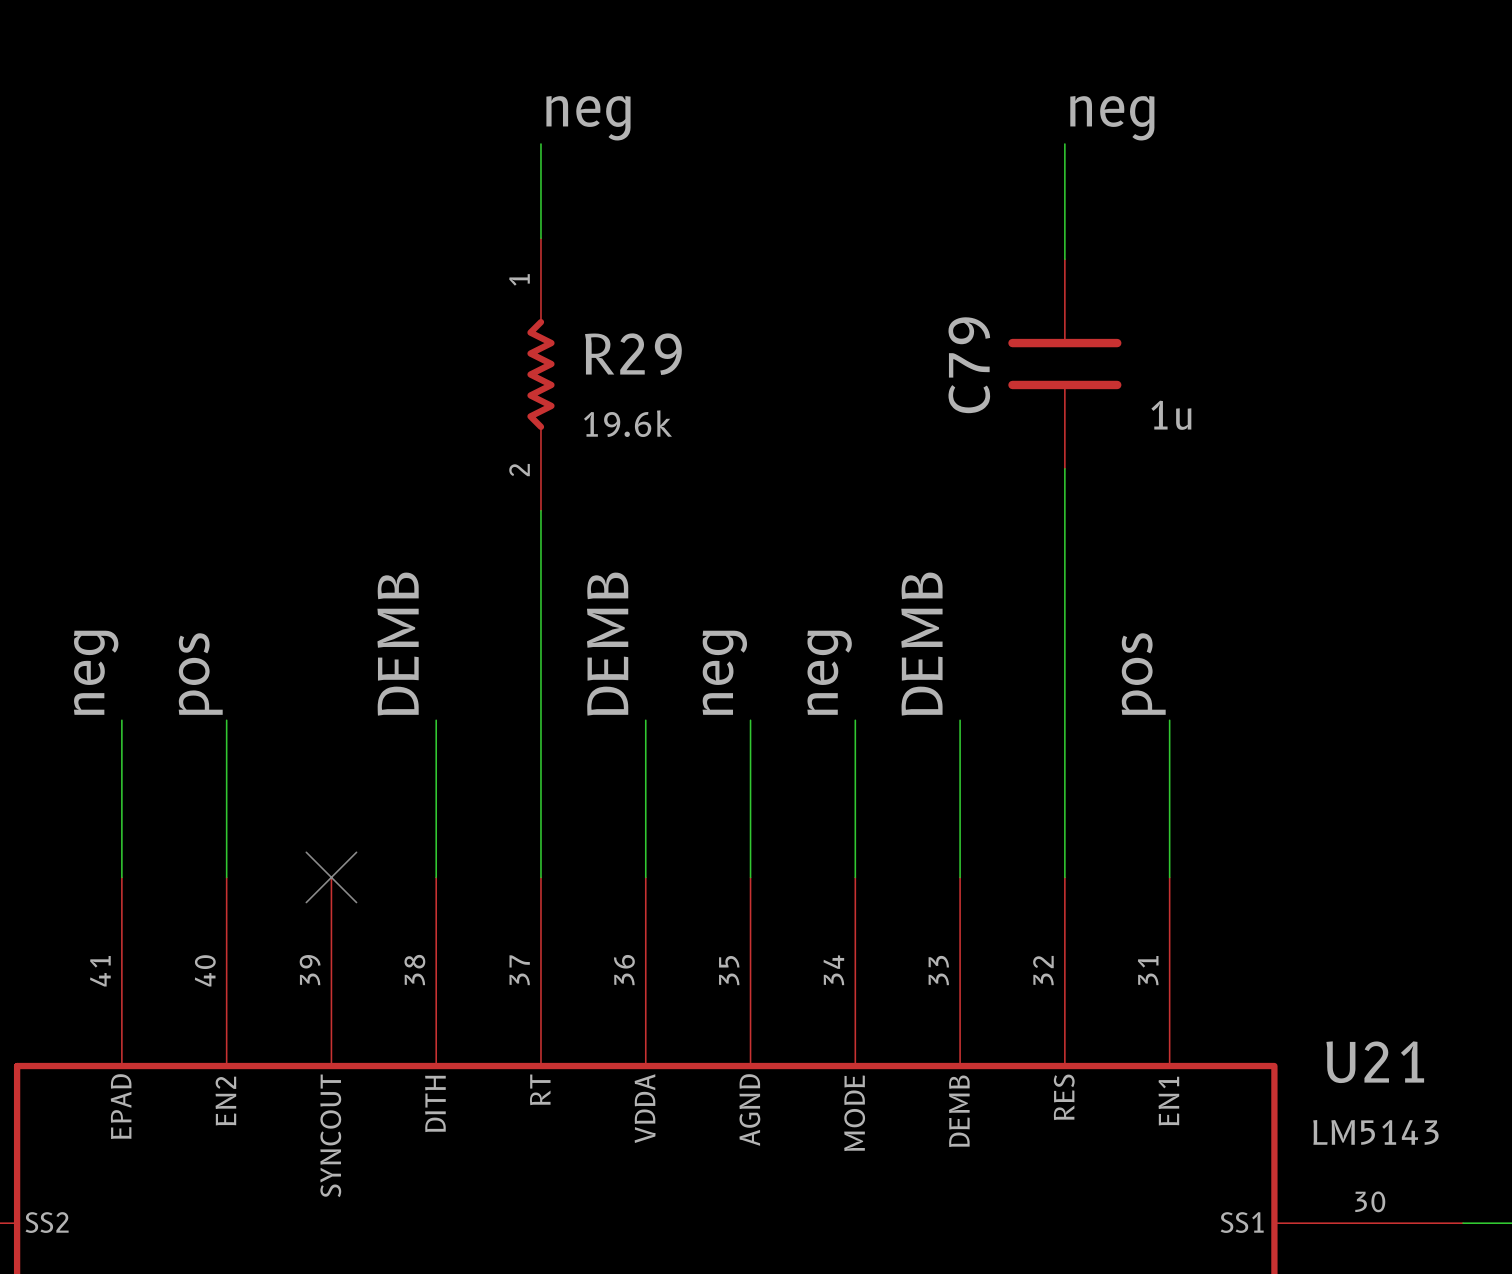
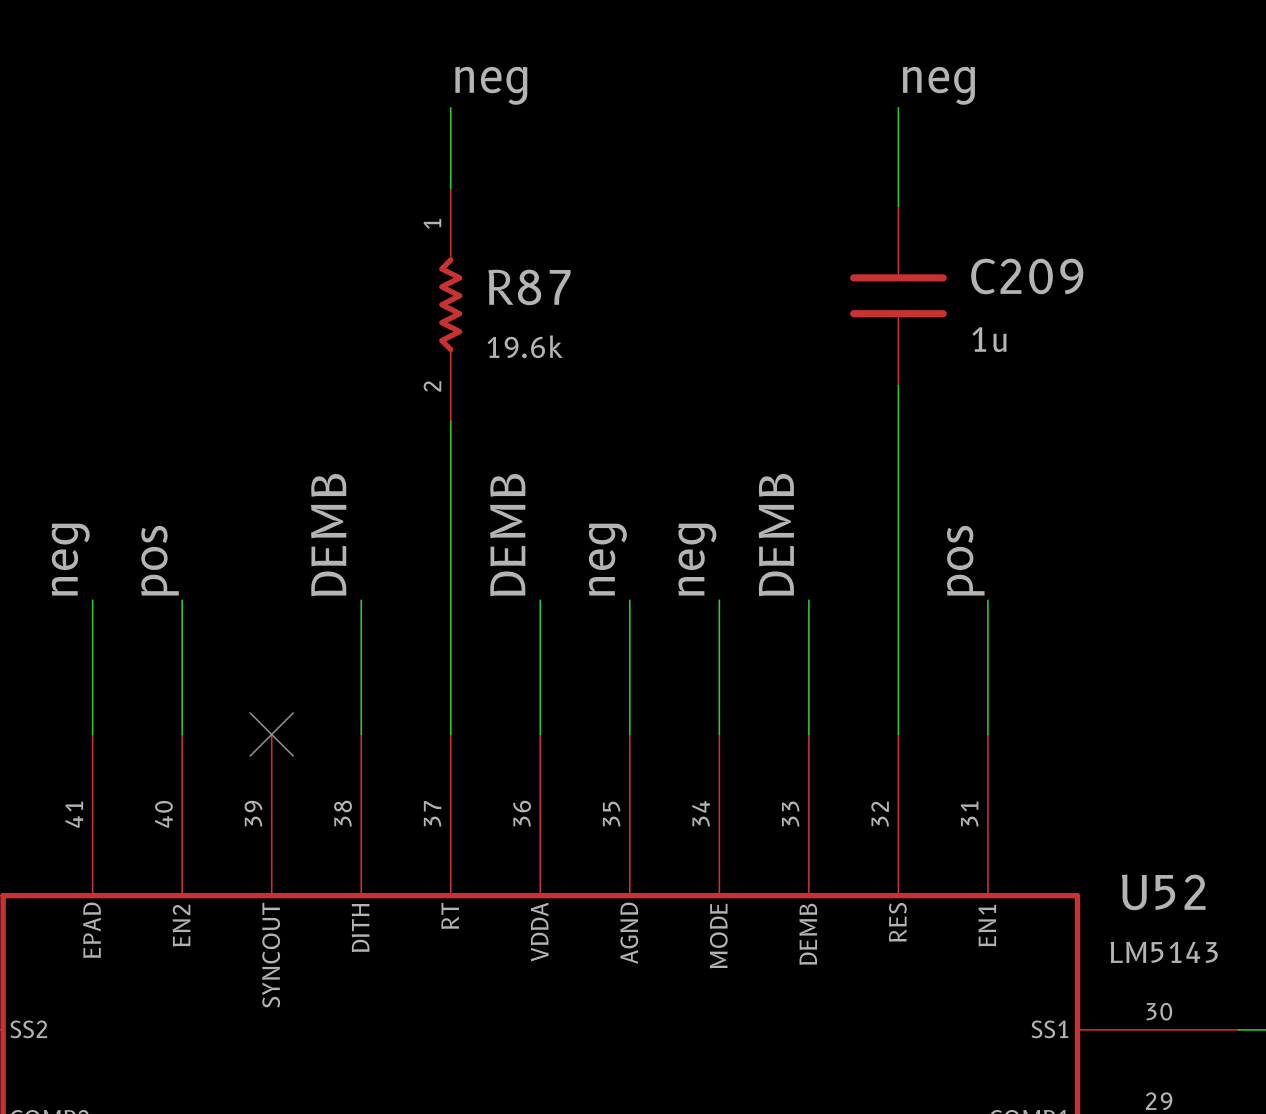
R29 name: R29 (633, 354) -> R87 (529, 287)
C79 name: C79 (969, 365) -> C209 (1027, 276)
U21 name: U21 (1375, 1062) -> U52 (1163, 892)

